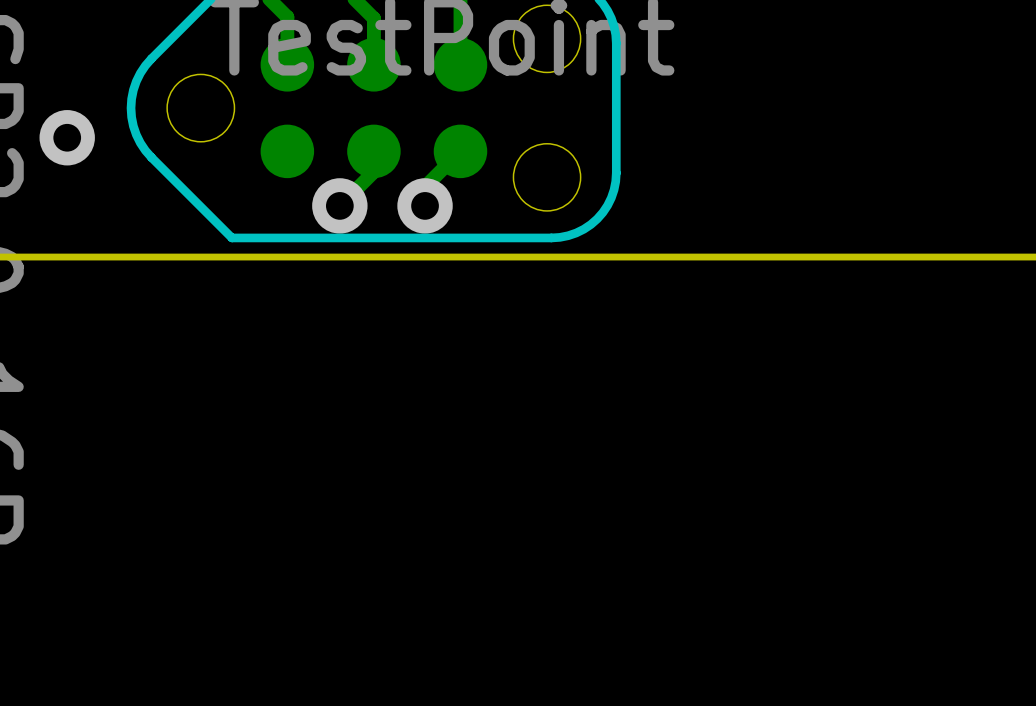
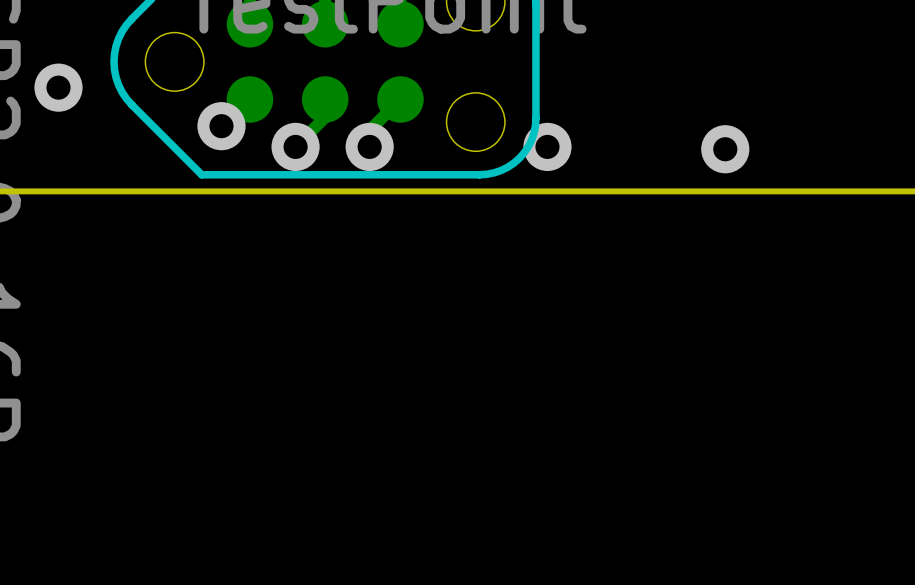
via: none -> (221, 126)
via: none -> (547, 146)
via: none -> (725, 149)

